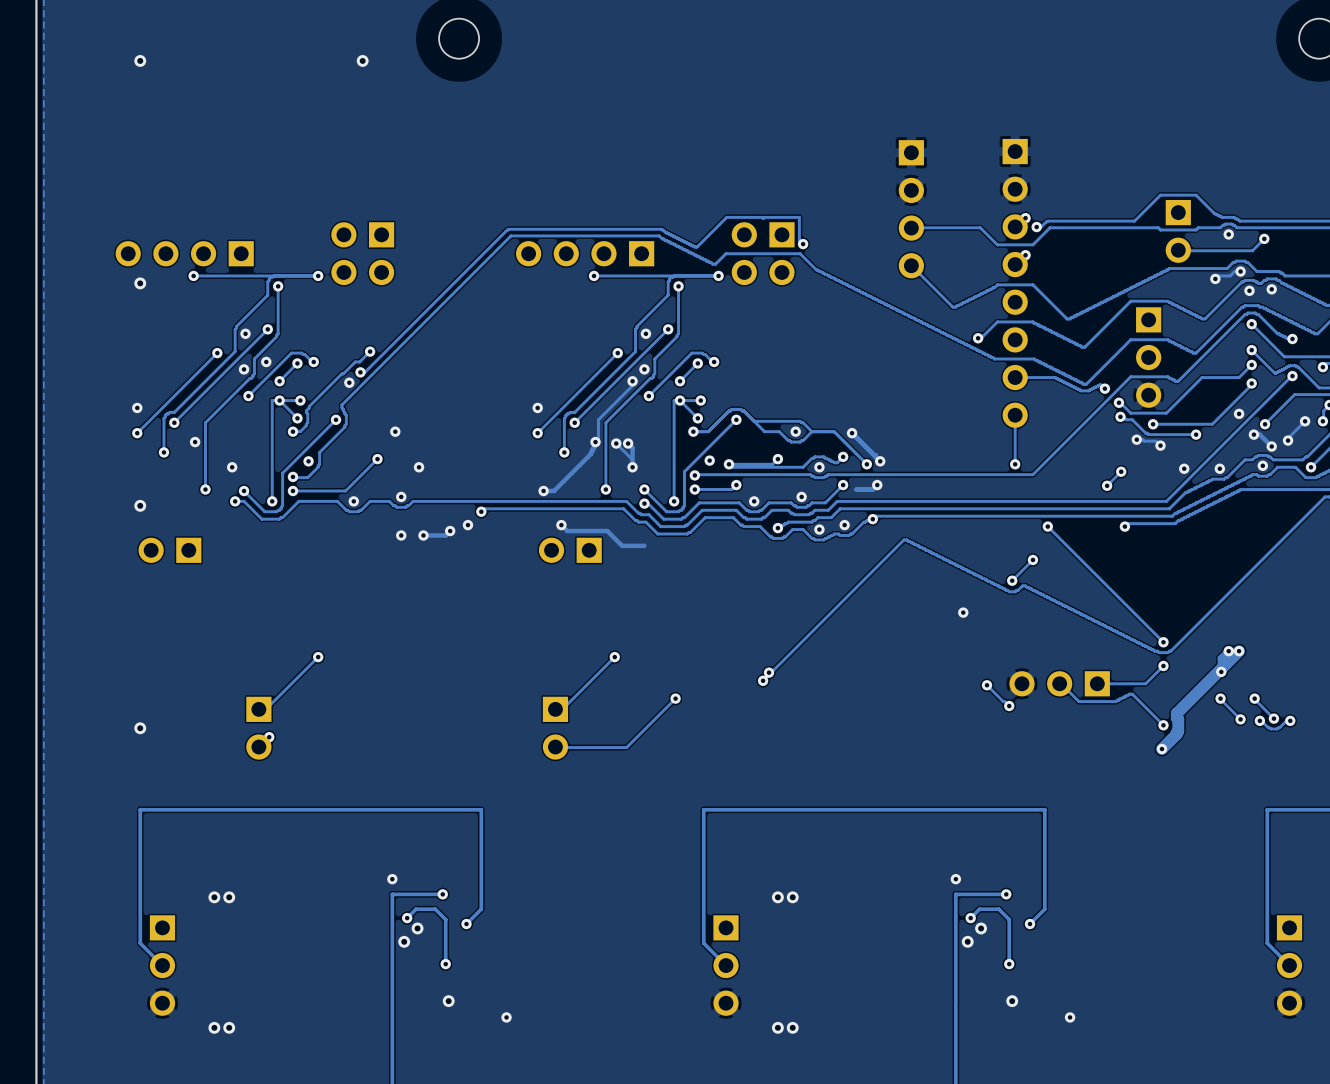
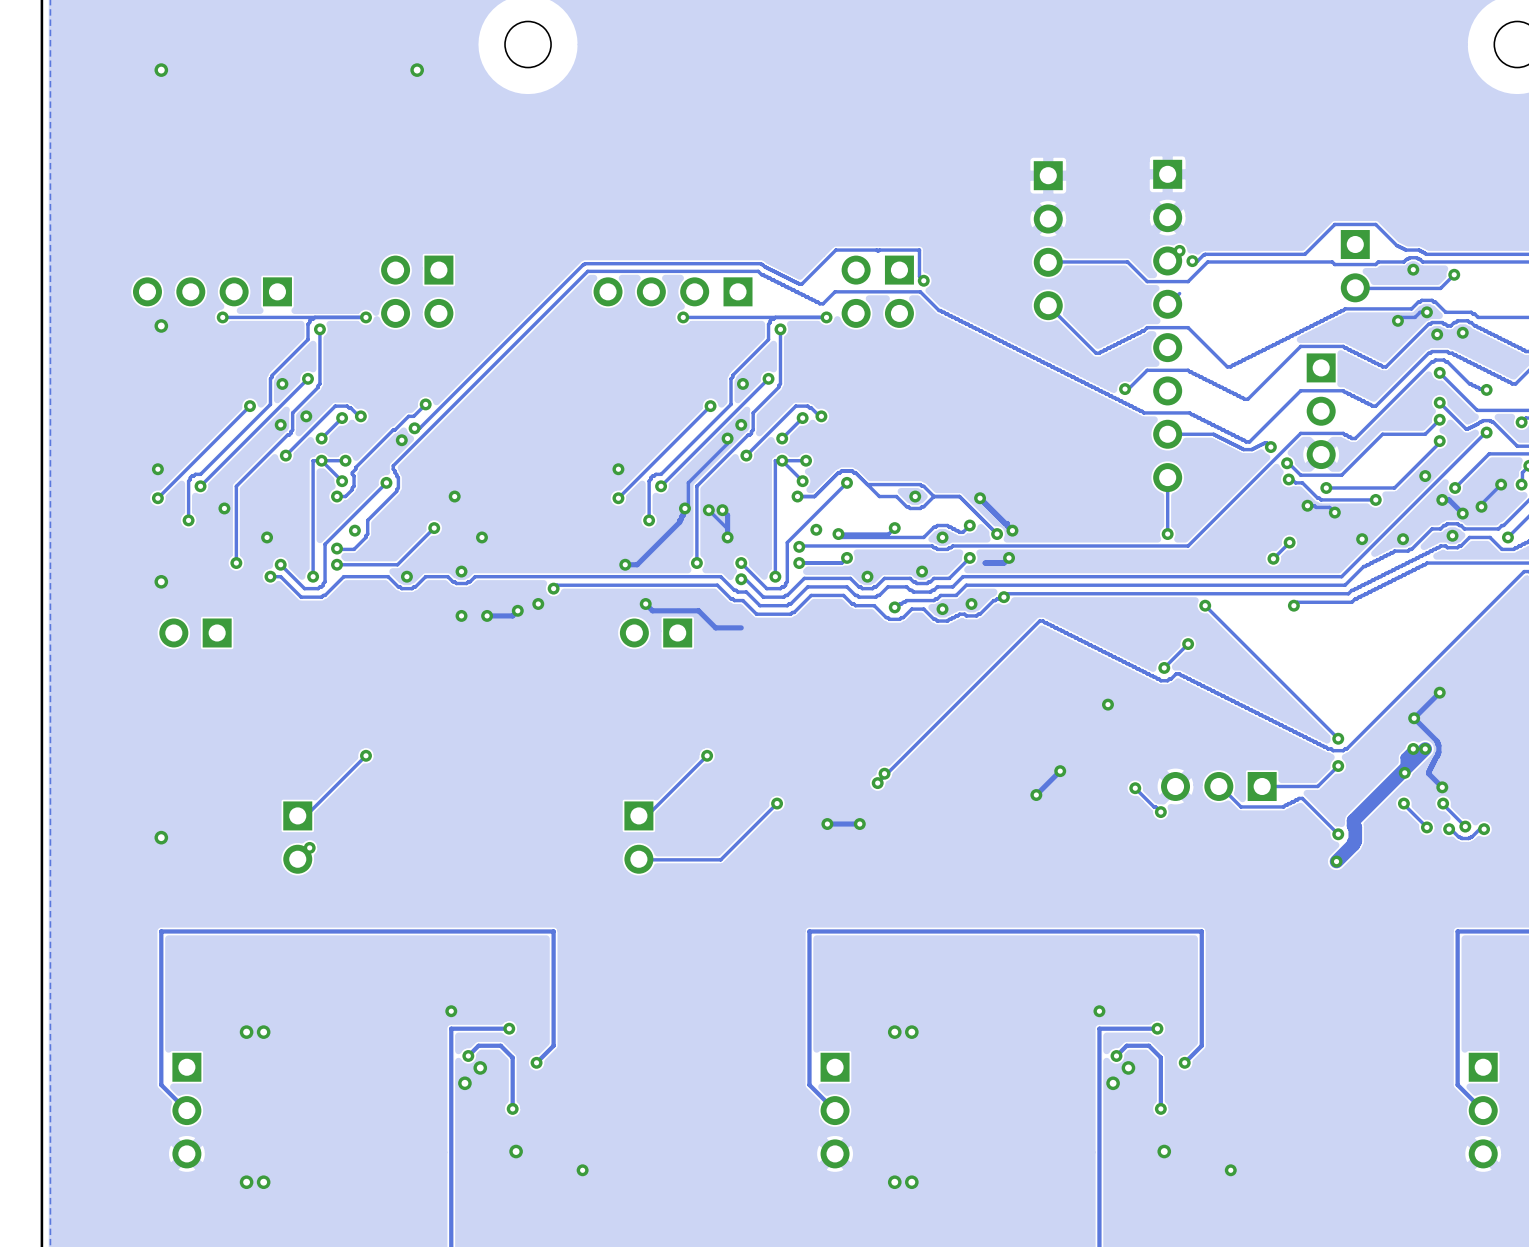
via: (1025, 255) -> none
track: none -> (1439, 692) (1414, 718) (1438, 743) (1438, 752) (1428, 773) (1442, 787)
via: none -> (1439, 692)
via: none -> (1414, 718)
track: none -> (1060, 771) (1036, 795)
via: none -> (1060, 771)
via: none -> (1442, 787)
via: none -> (1036, 795)
via: none -> (827, 824)
track: none -> (859, 824) (827, 824)
via: none -> (859, 824)

